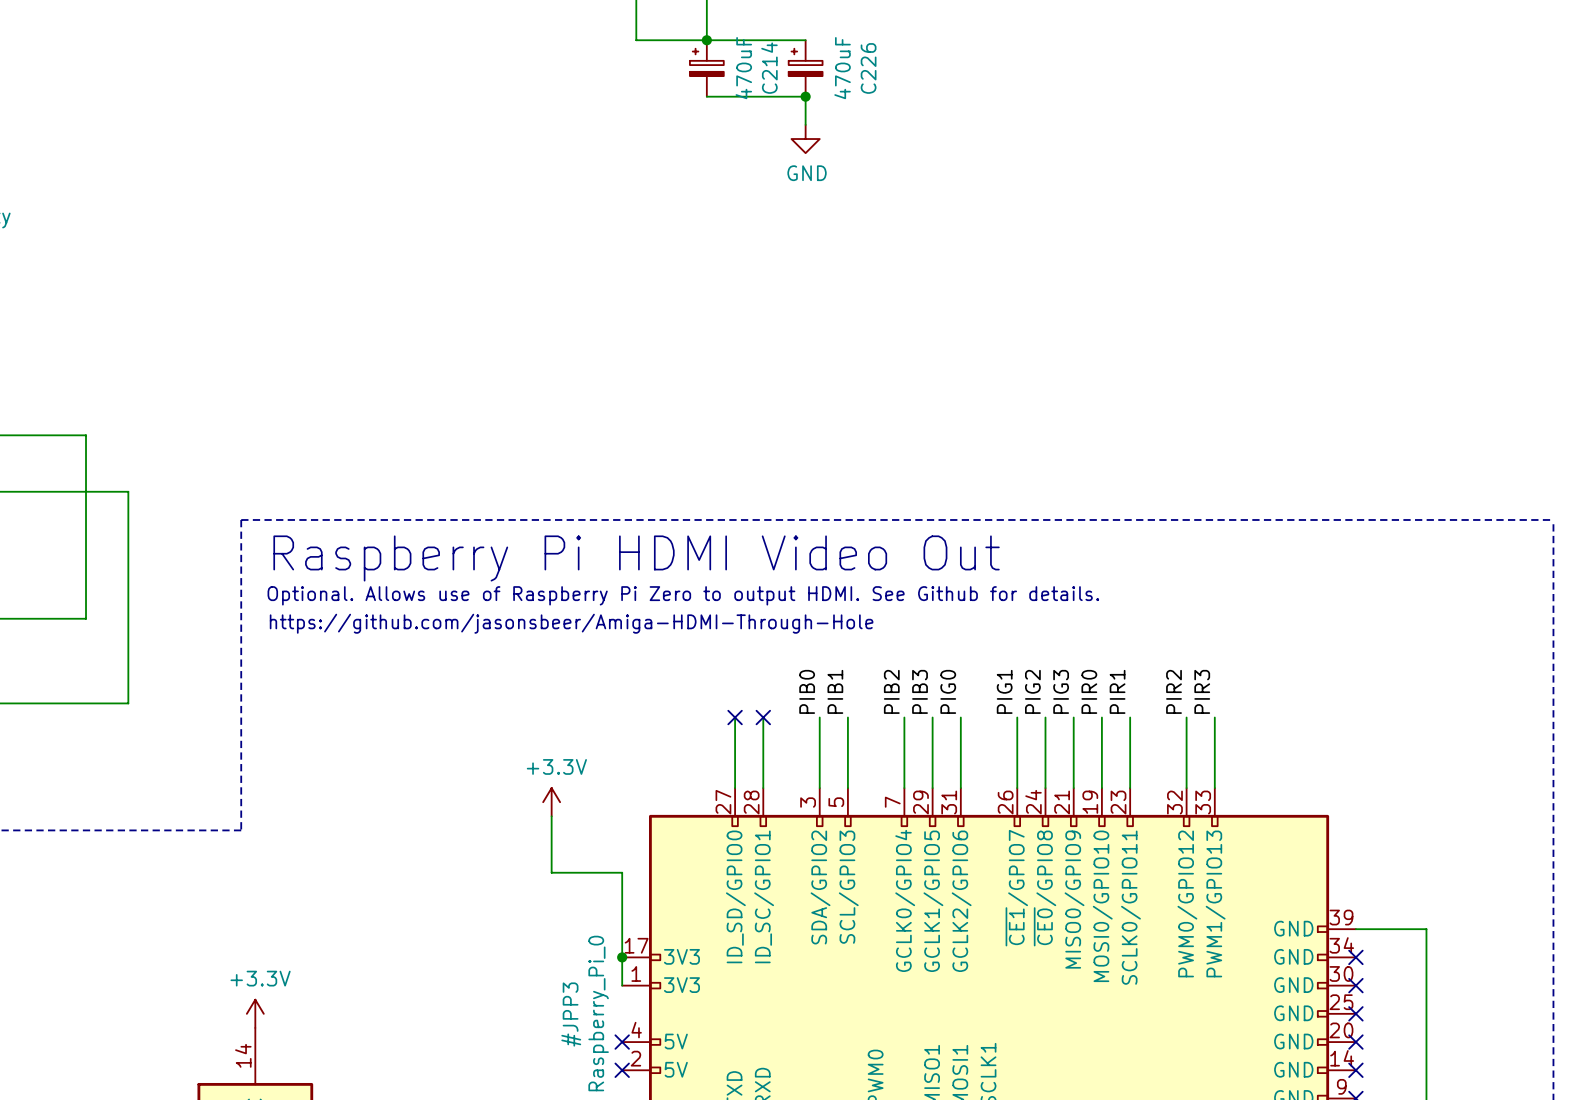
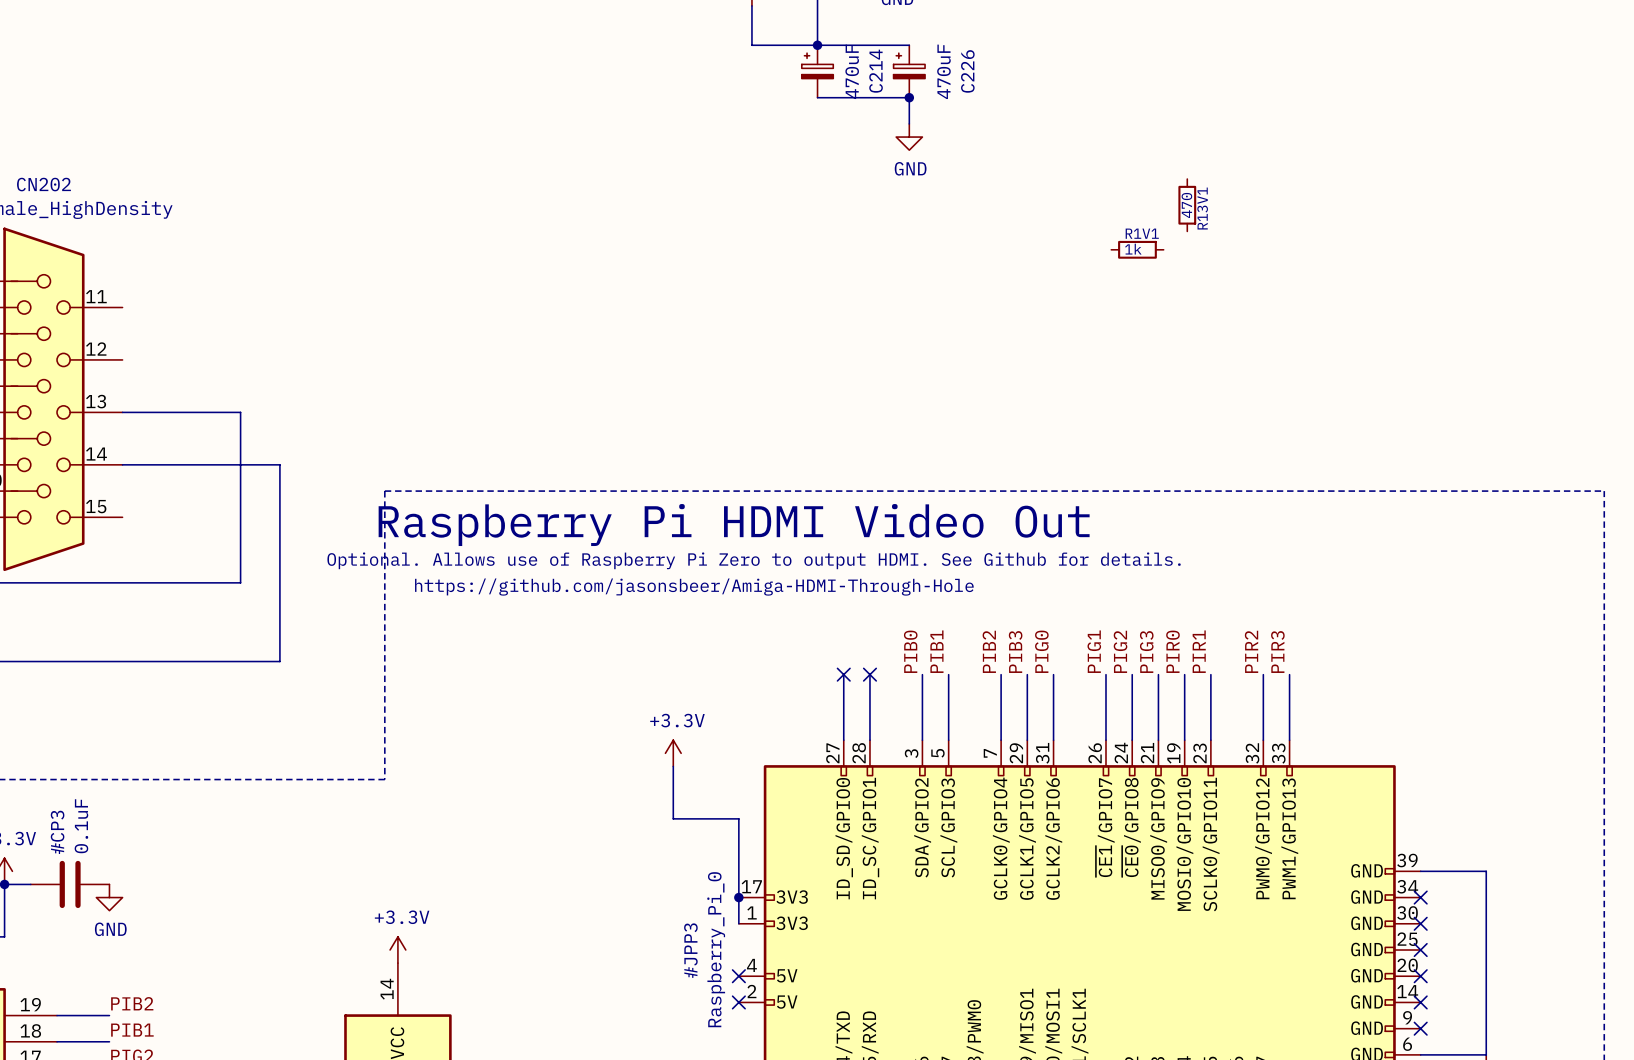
R13V1: none -> 470 (1187, 205)
R1V1: none -> 1k (1137, 249)

